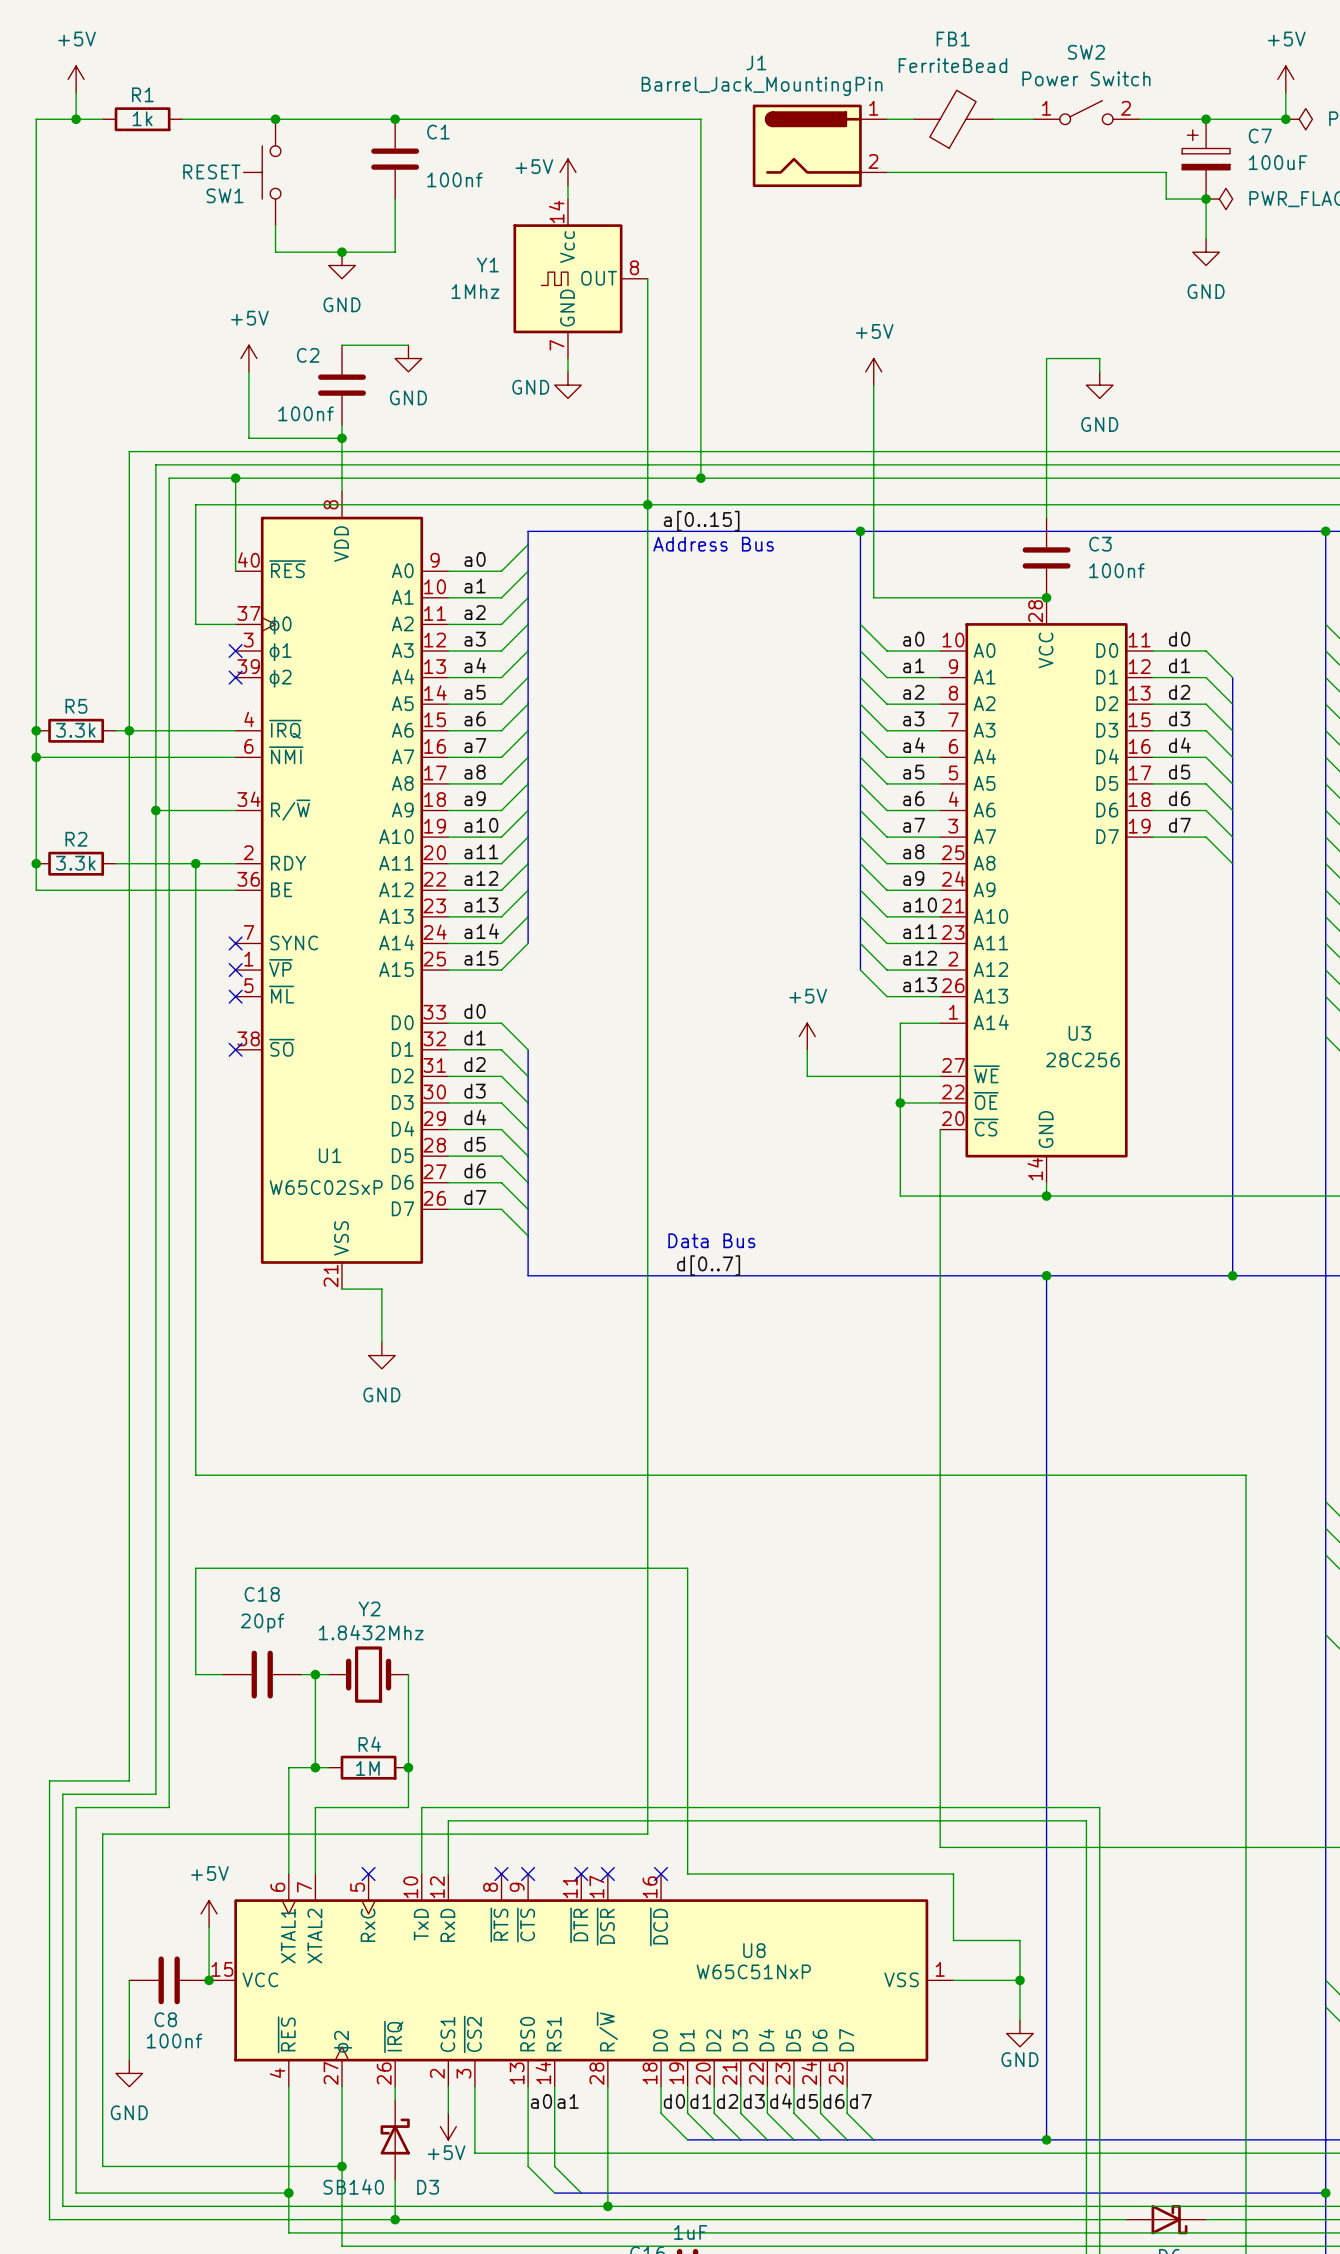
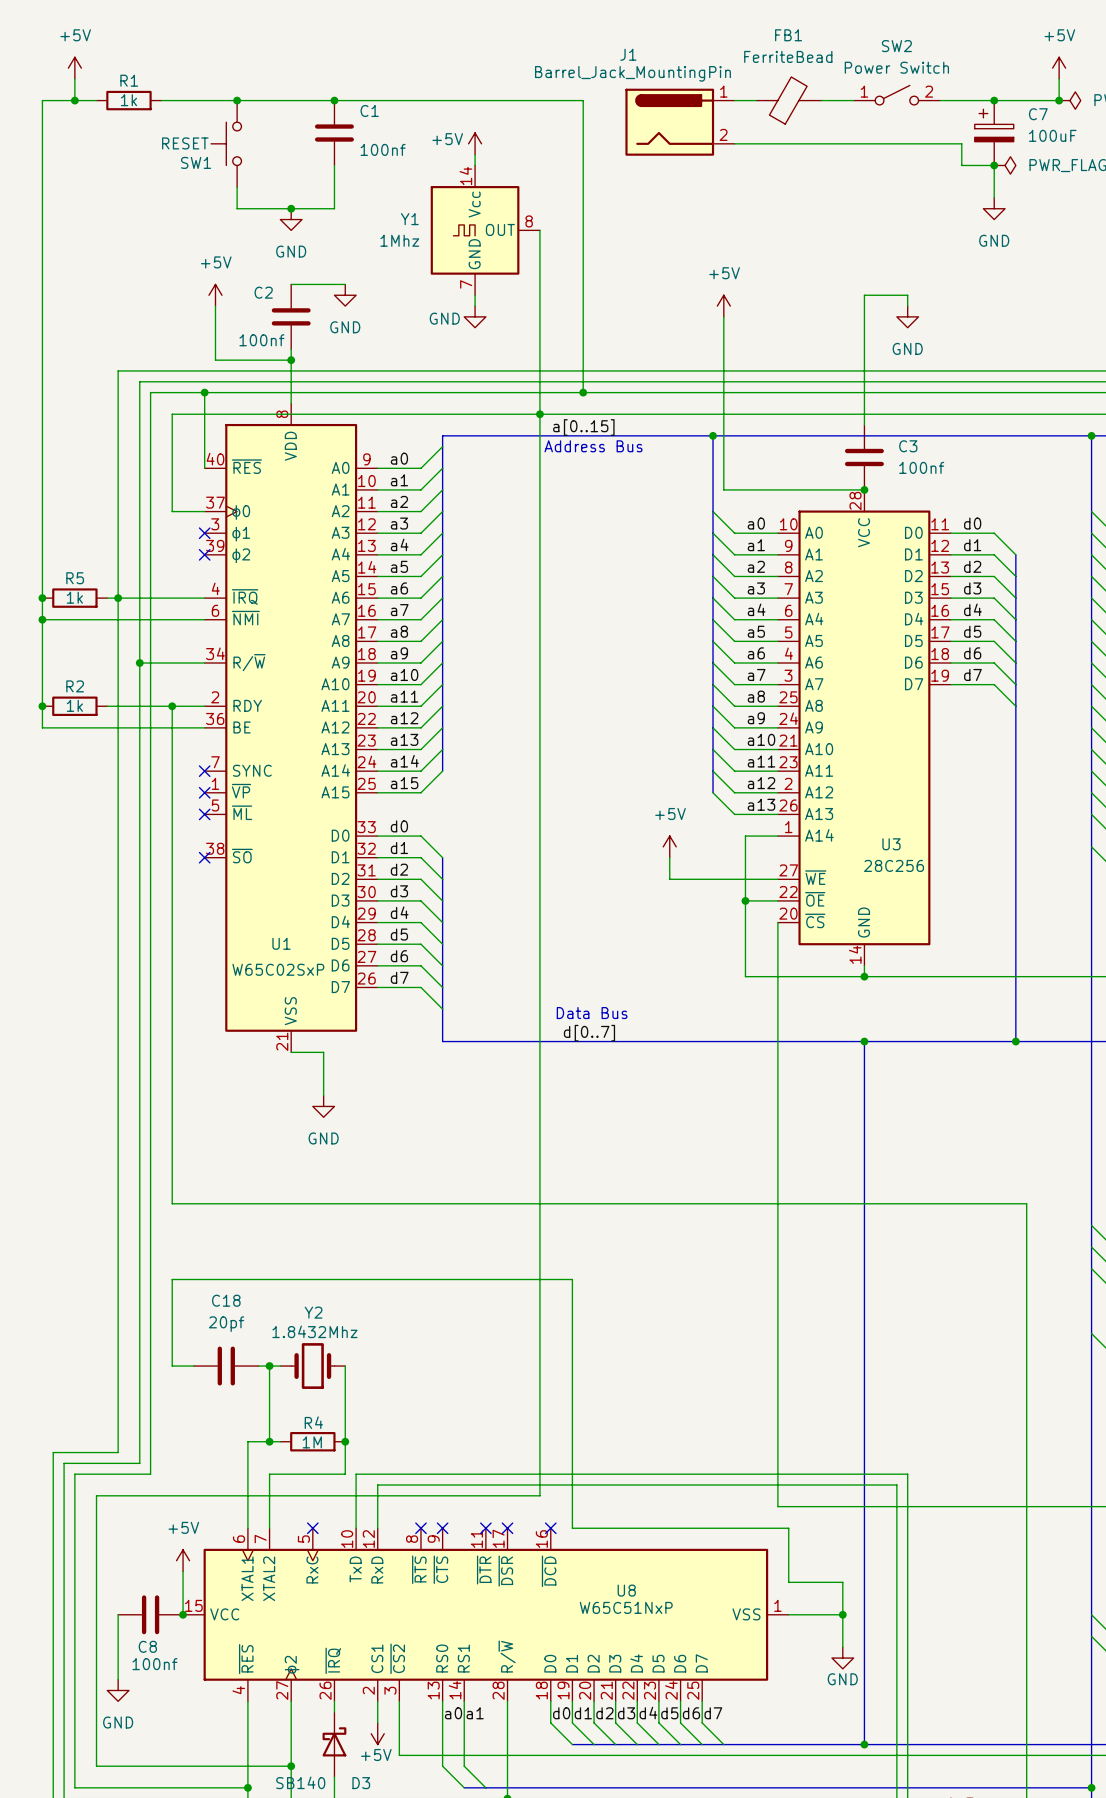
R5 value: 3.3k (75, 730) -> 1k (74, 597)
R2 value: 3.3k (75, 863) -> 1k (74, 705)

